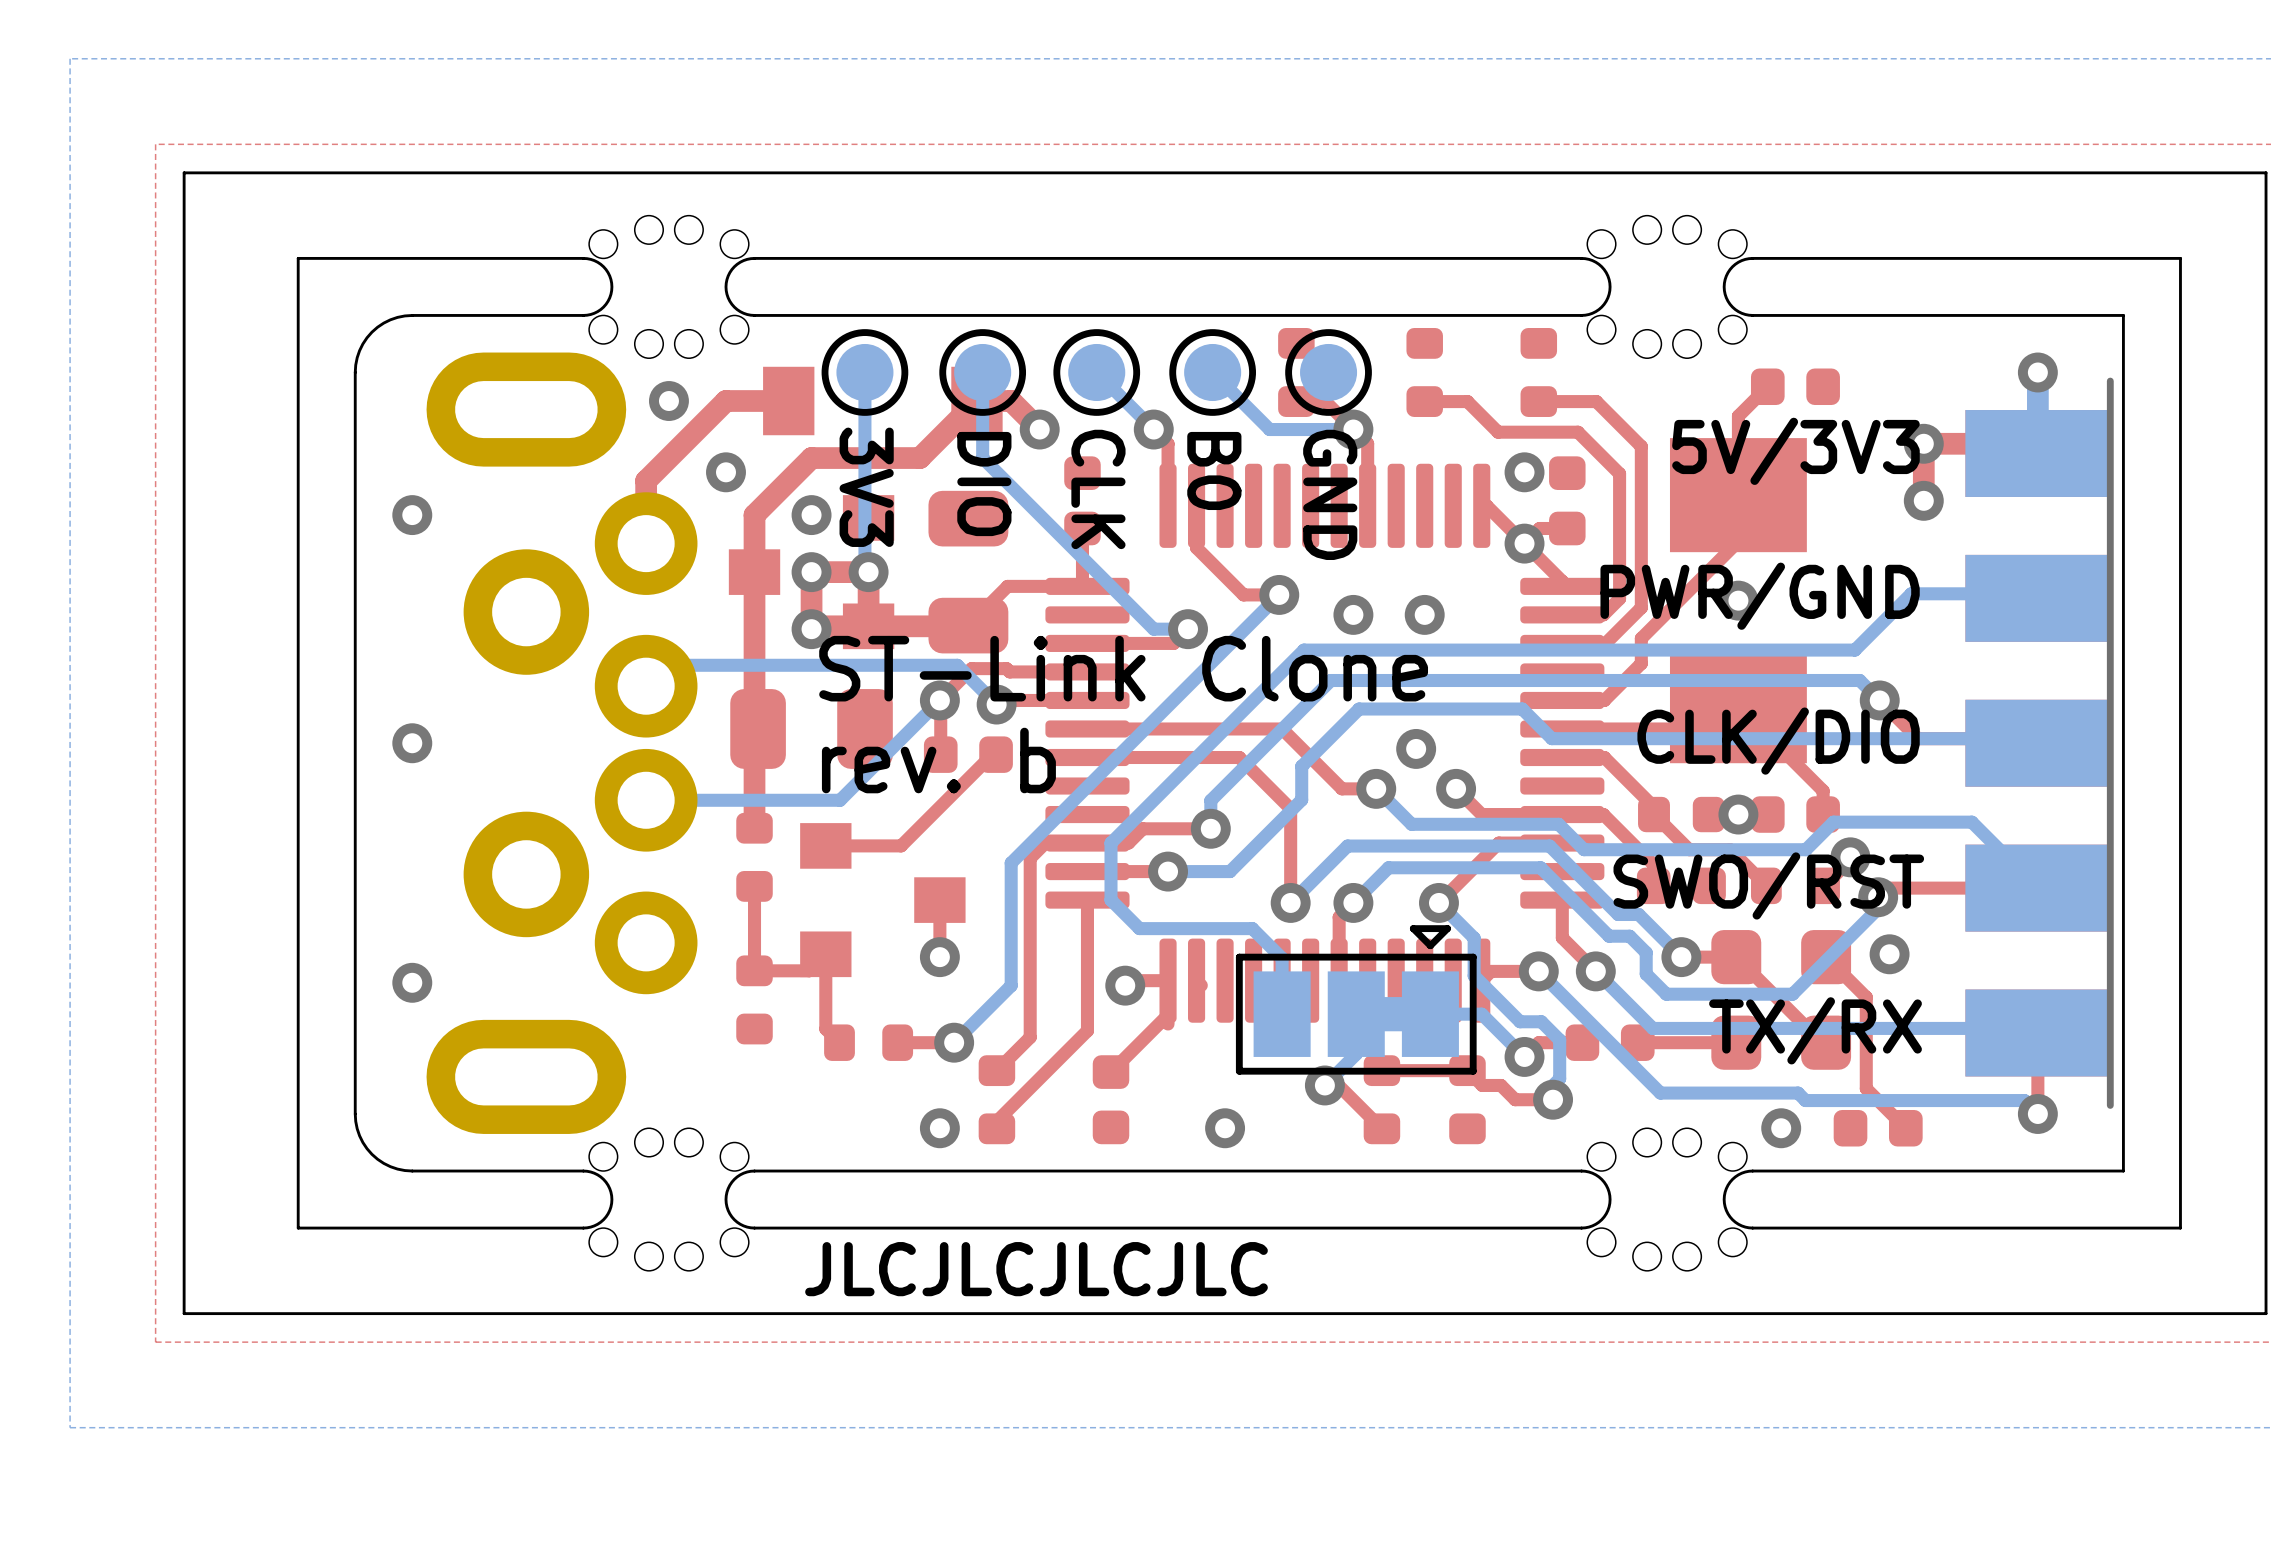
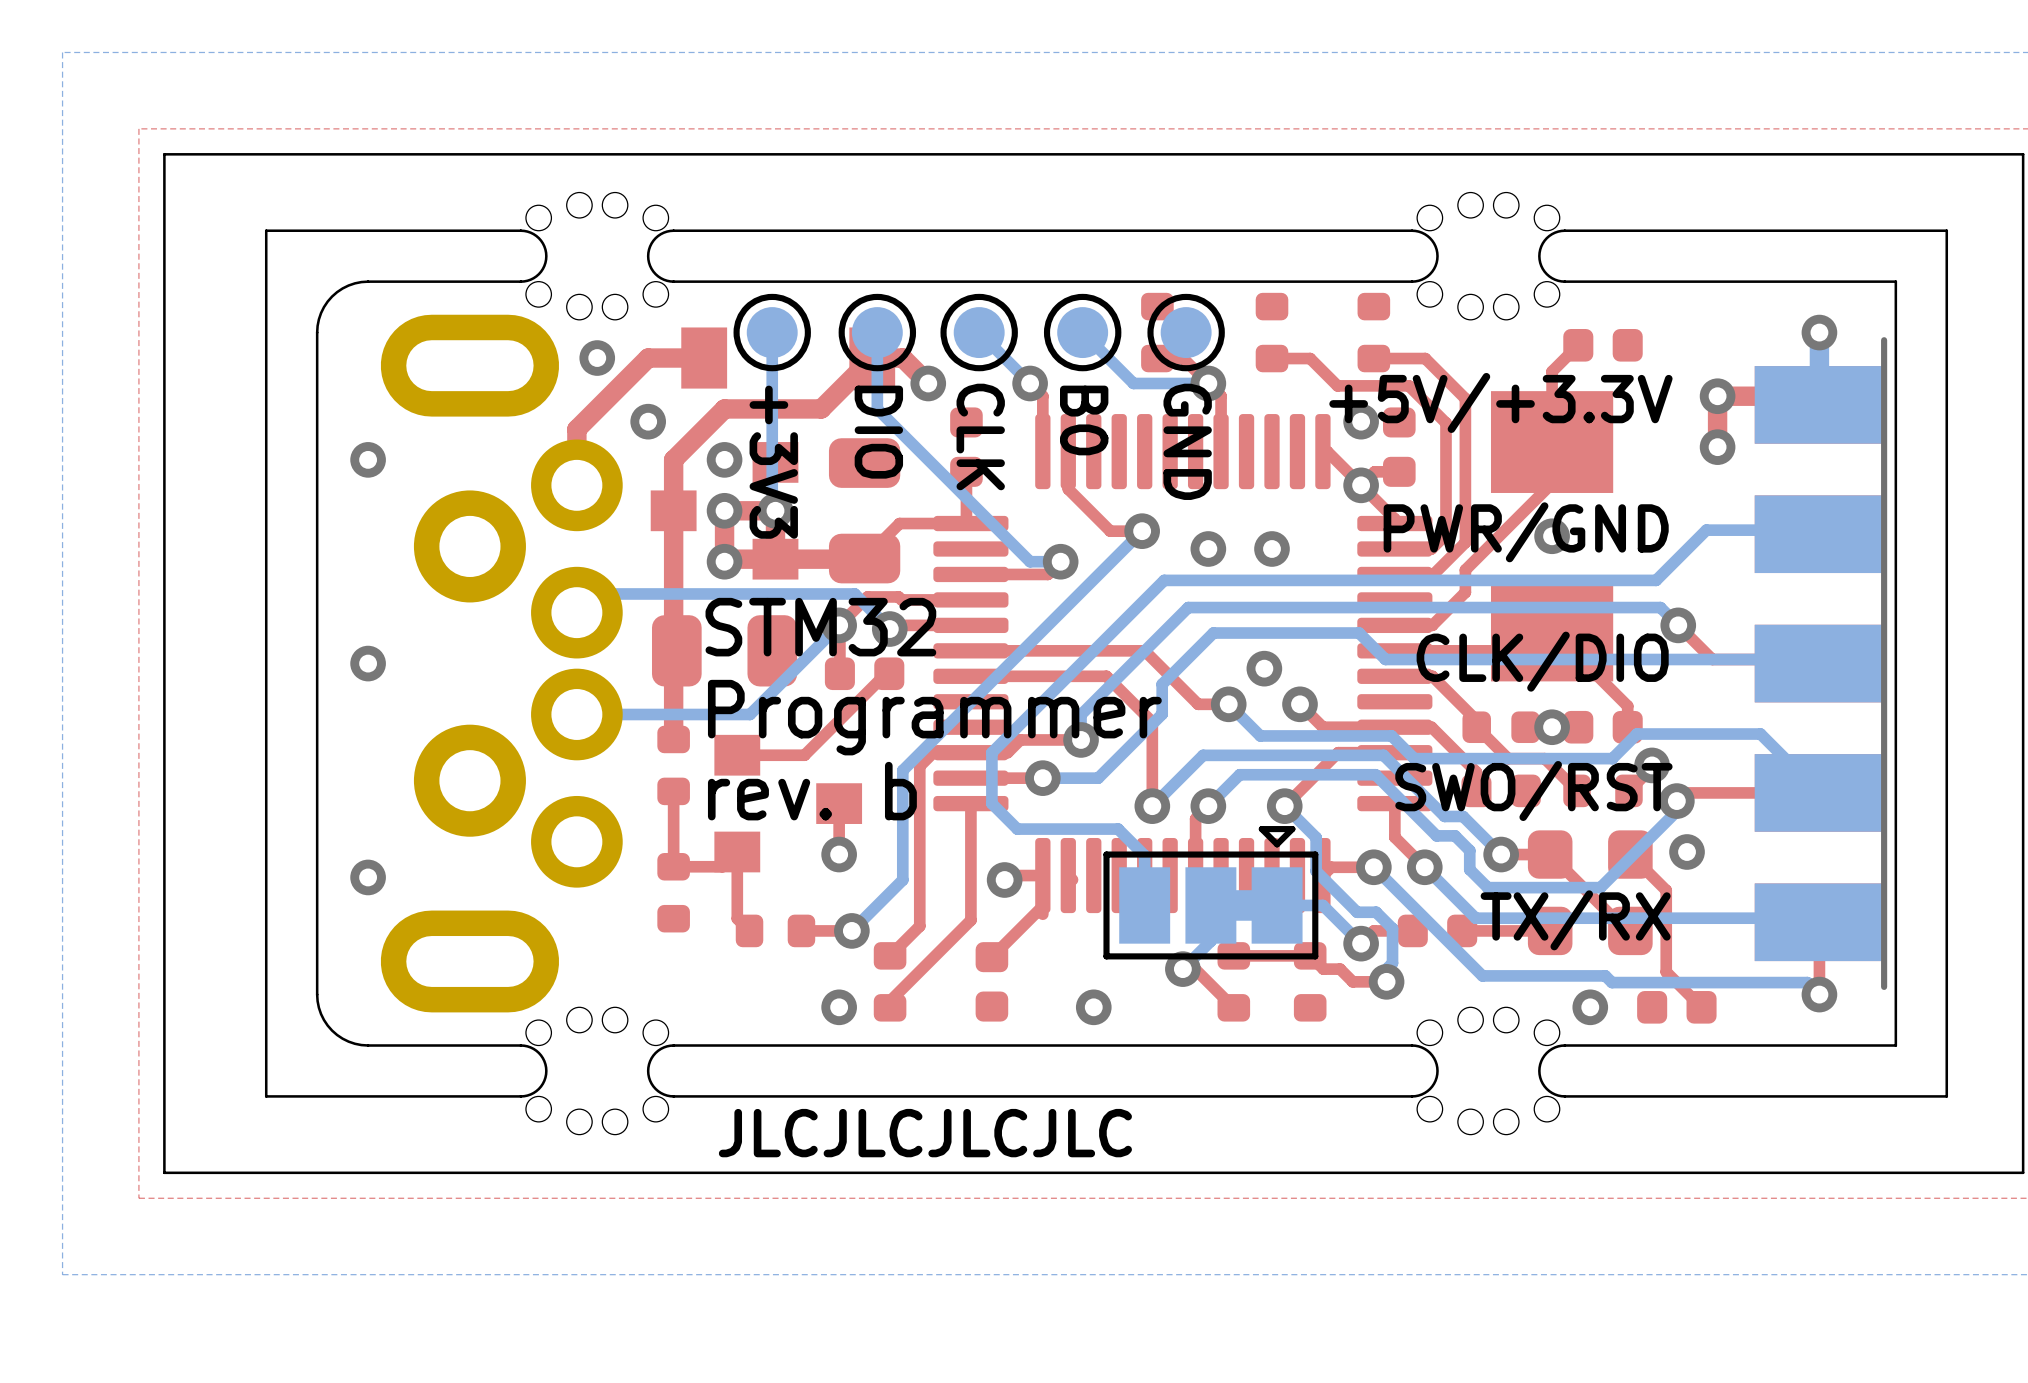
text: 5V/3V3 (1795, 451) -> +5V/+3.3V (1500, 402)
text: 3V3 (866, 487) -> +3V3 (773, 462)
text position: PWR/GND (1760, 596) -> PWR/GND (1526, 532)
text: ST-Link Clone (1123, 668) -> none
text: none -> STM32 (820, 627)
text position: CLK/DIO (1778, 741) -> CLK/DIO (1542, 661)
text position: rev. b (938, 760) -> rev. b (812, 791)
text: none -> Programmer (934, 717)
text position: SWO/RST (1768, 885) -> SWO/RST (1533, 791)
text position: TX/RX (1815, 1030) -> TX/RX (1575, 920)

